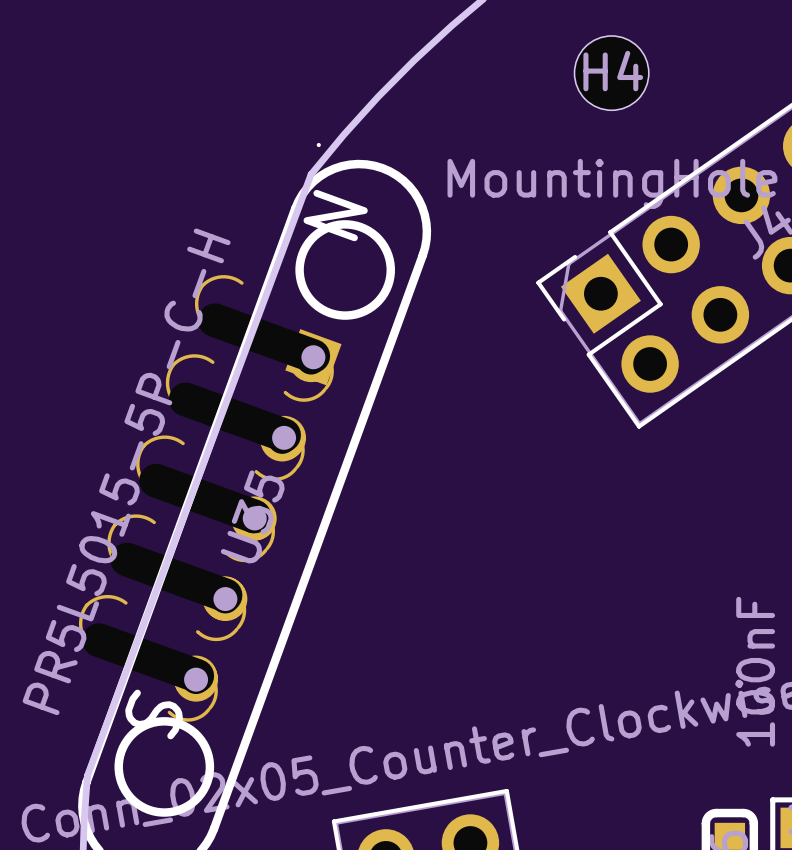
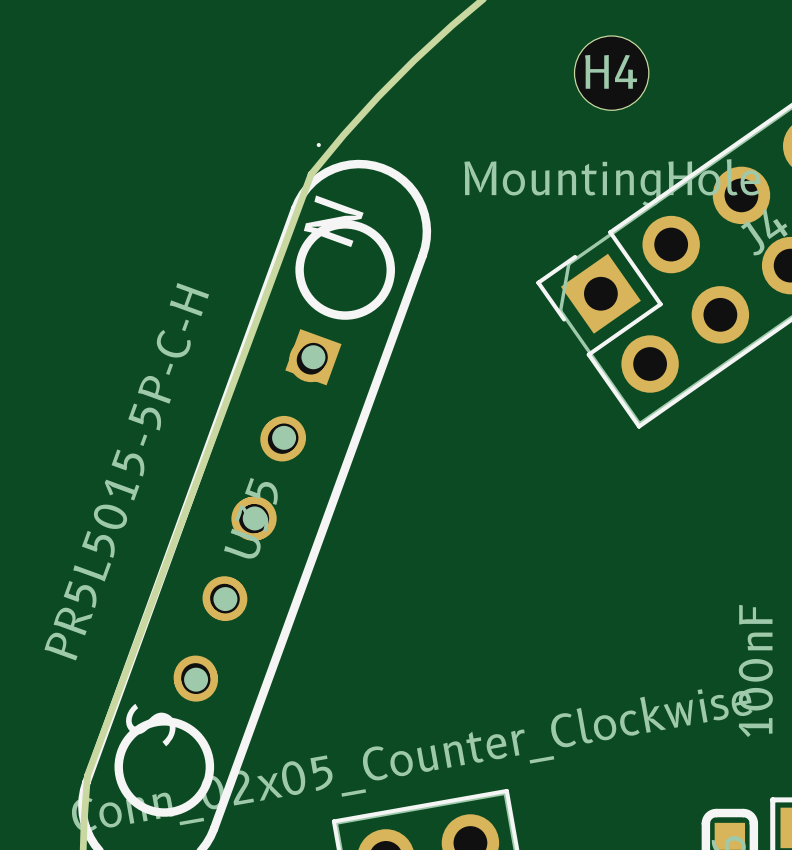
part: (264, 338) -> none
part: (235, 417) -> none
part: (205, 498) -> none
part: (176, 577) -> none
part: (148, 658) -> none

